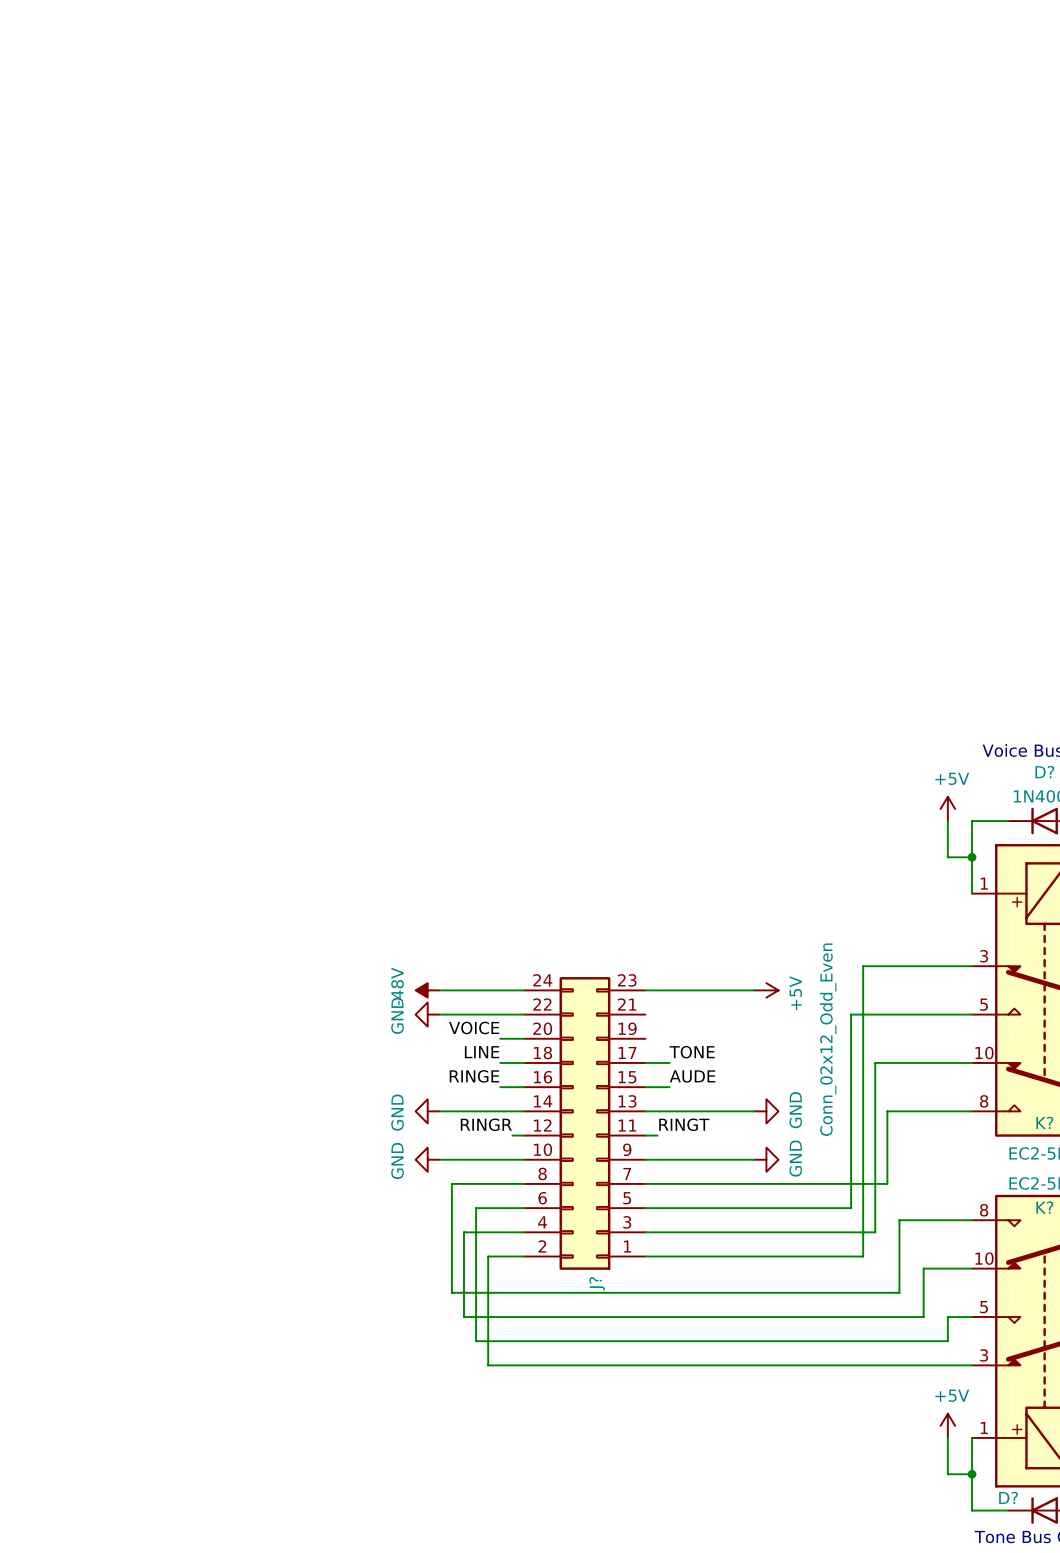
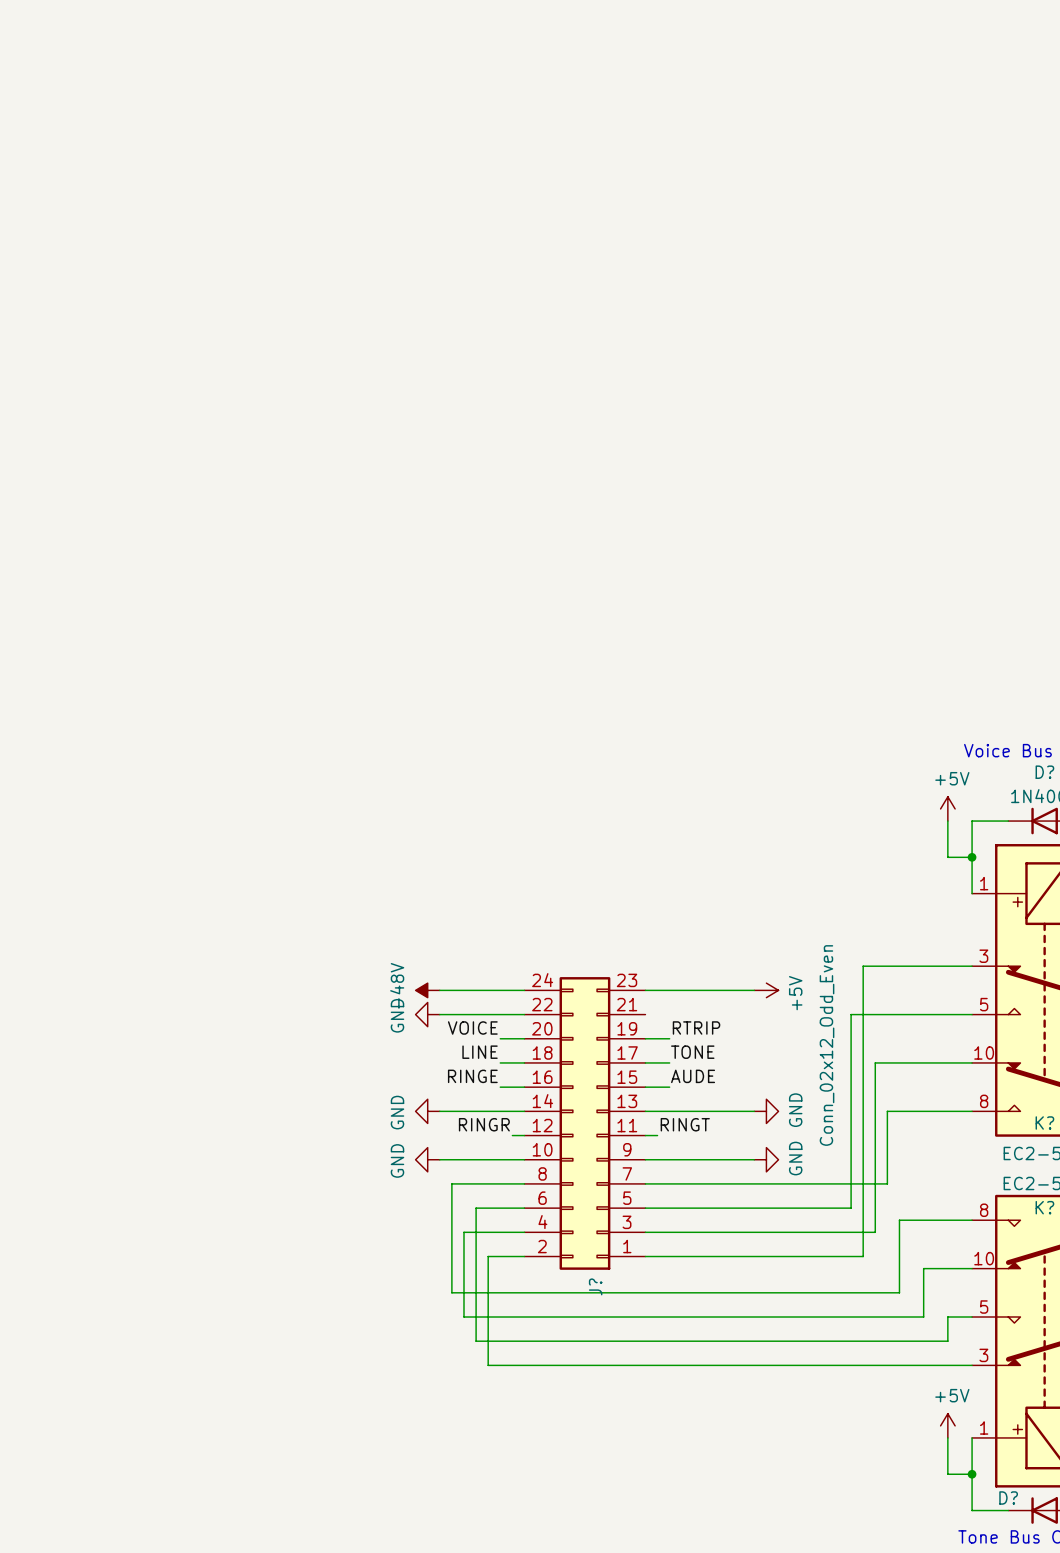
label: none -> RTRIP (696, 1027)
wire: none -> (645, 1038) (669, 1038)

